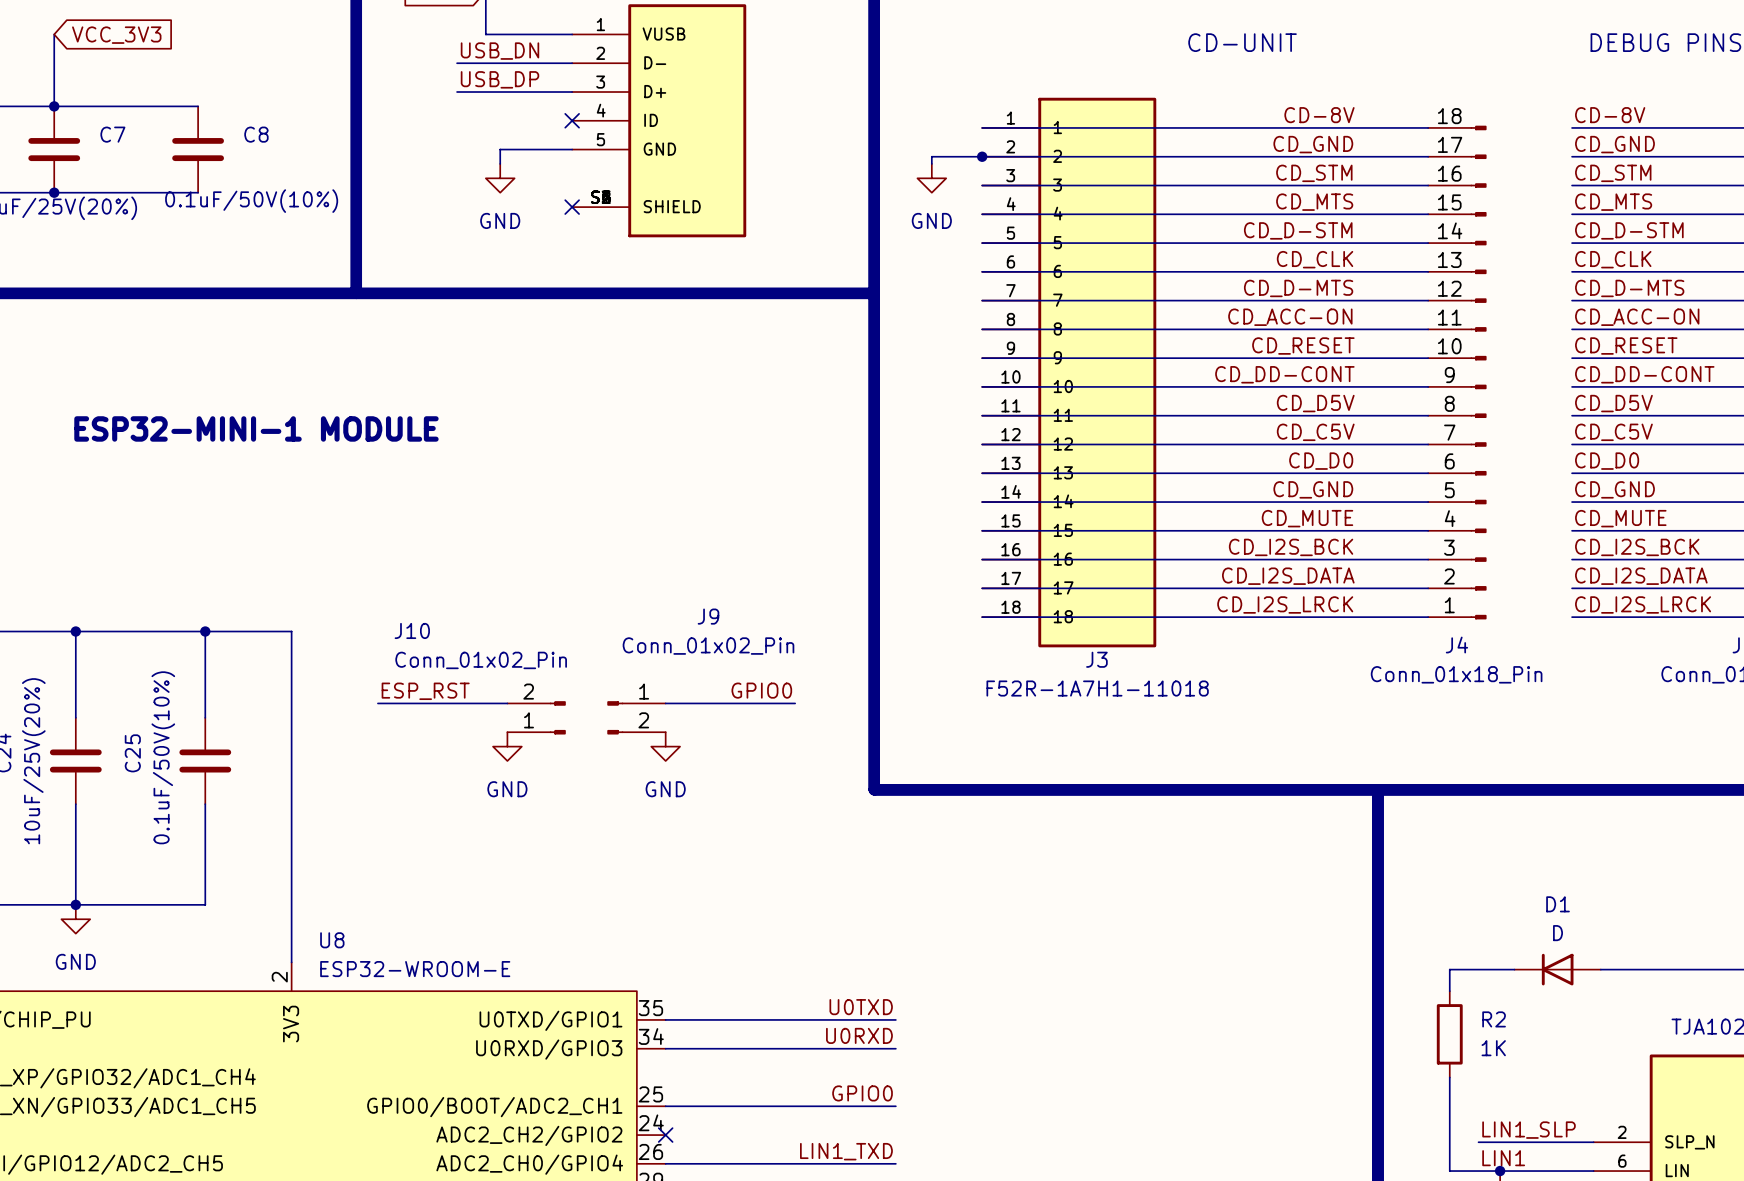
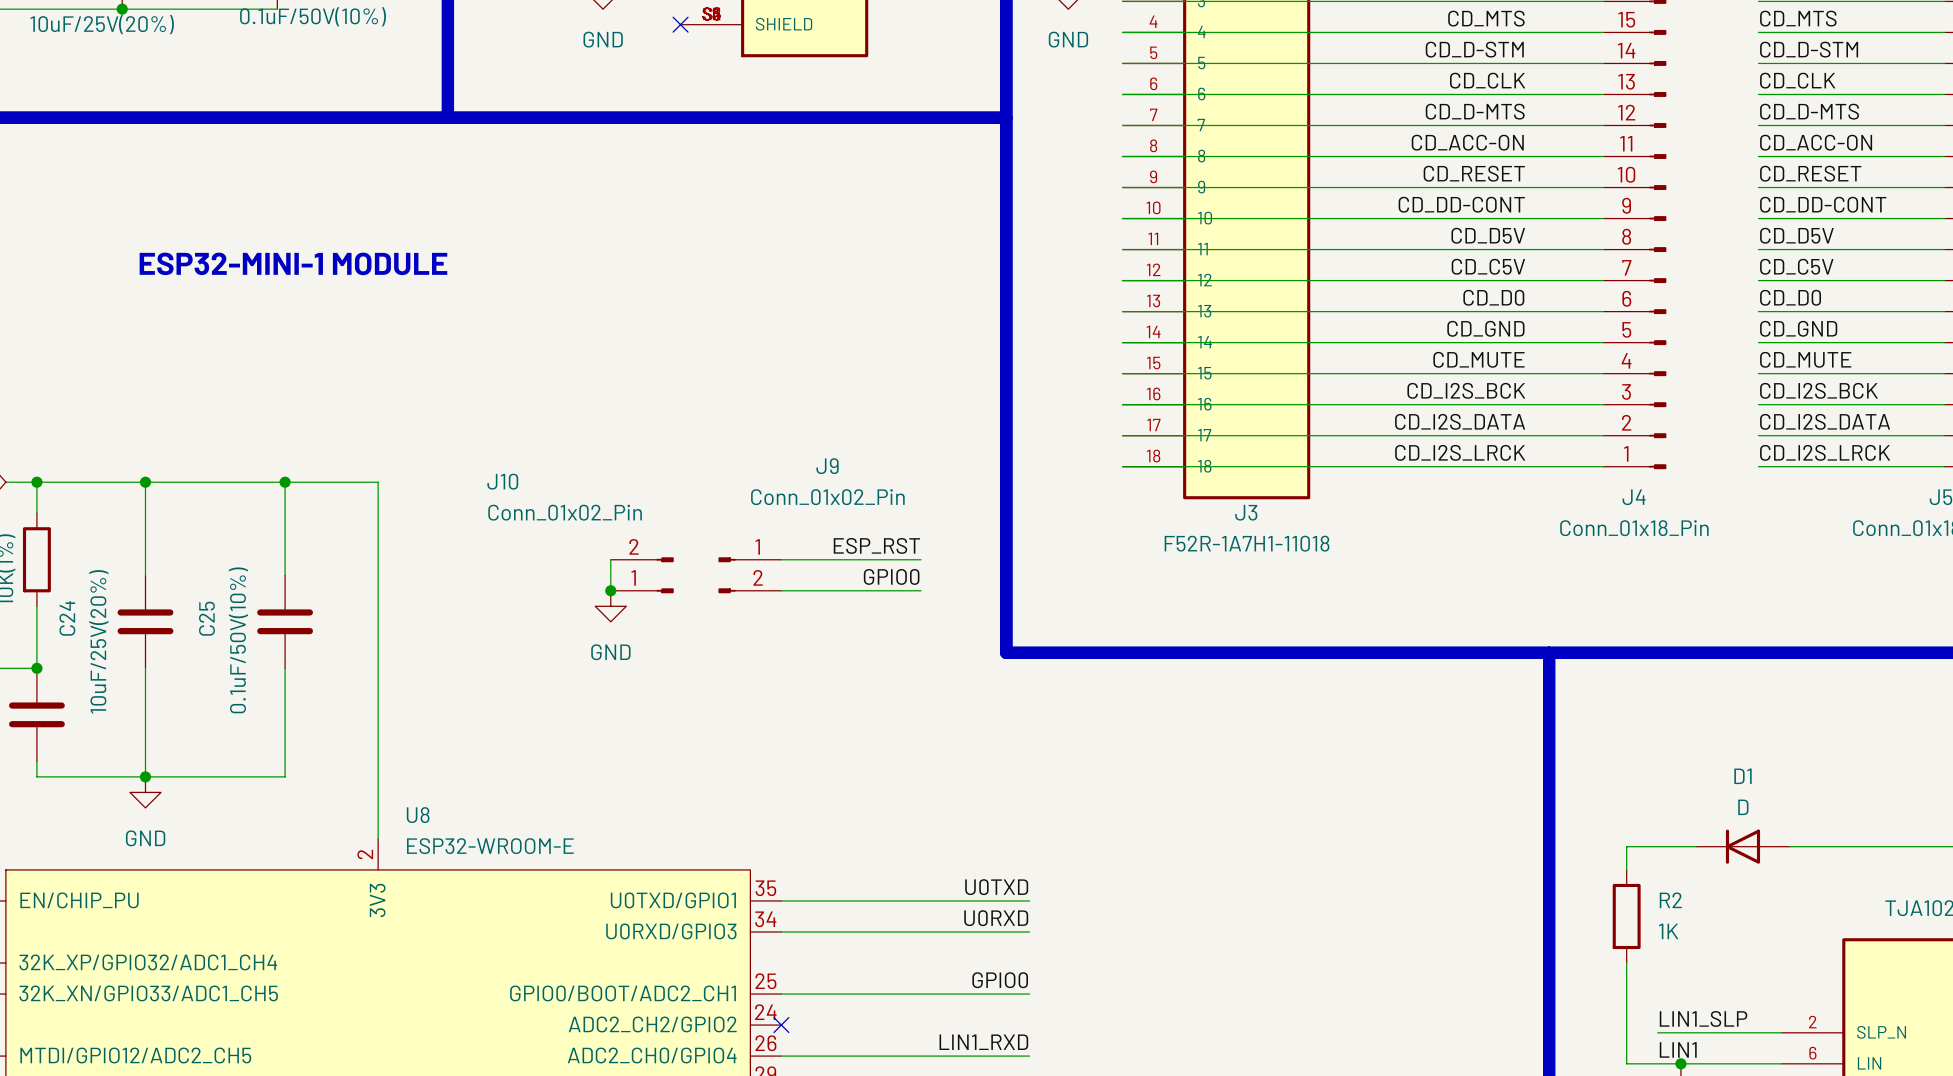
label: GPIO0 (761, 690) -> ESP_RST (876, 545)
label: ESP_RST (425, 691) -> none
wire: (377, 703) (507, 703) -> (610, 590) (610, 559)
label: none -> GPIO0 (891, 576)
junction: none -> (610, 590)
wire: none -> (781, 590) (920, 590)
power symbol: GND (665, 746) -> none
label: LIN1_TXD (846, 1151) -> LIN1_RXD (983, 1042)

